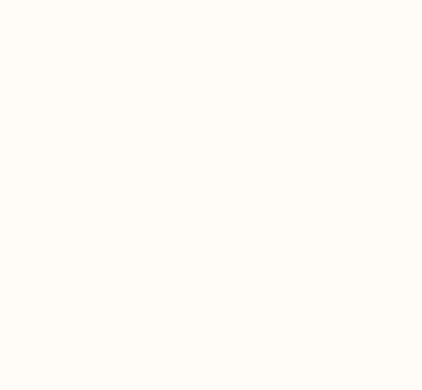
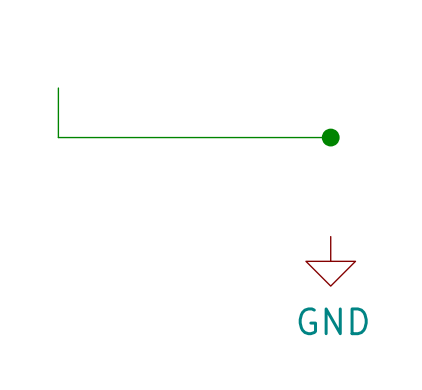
wire: none -> (58, 88) (58, 137) (330, 137)
junction: none -> (330, 137)
power symbol: none -> GND (330, 261)

